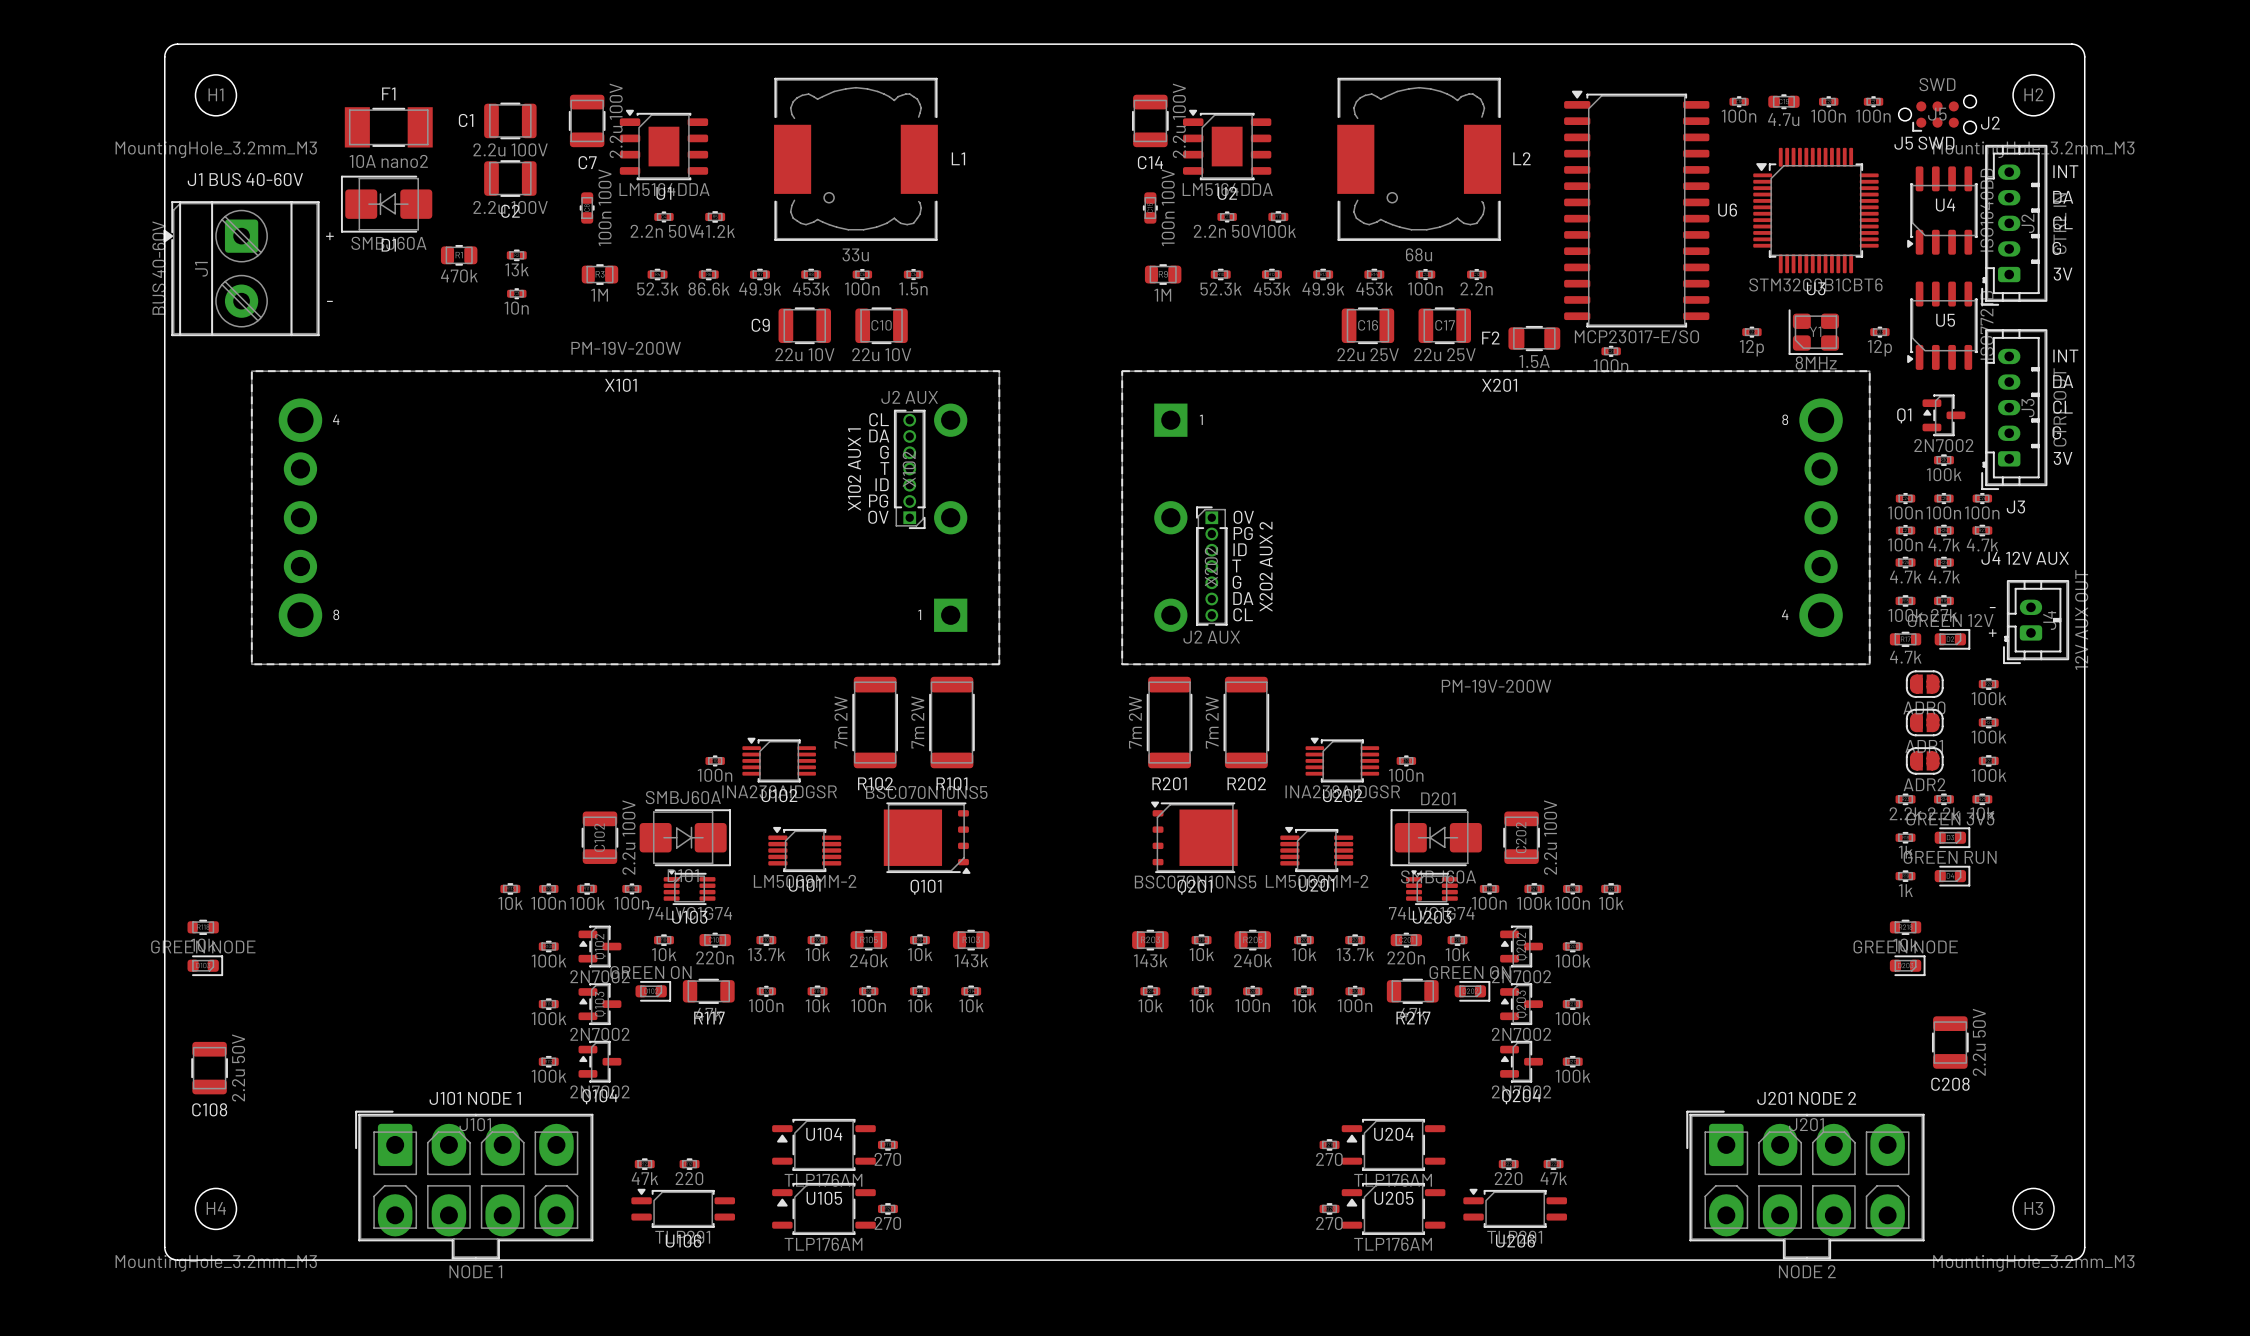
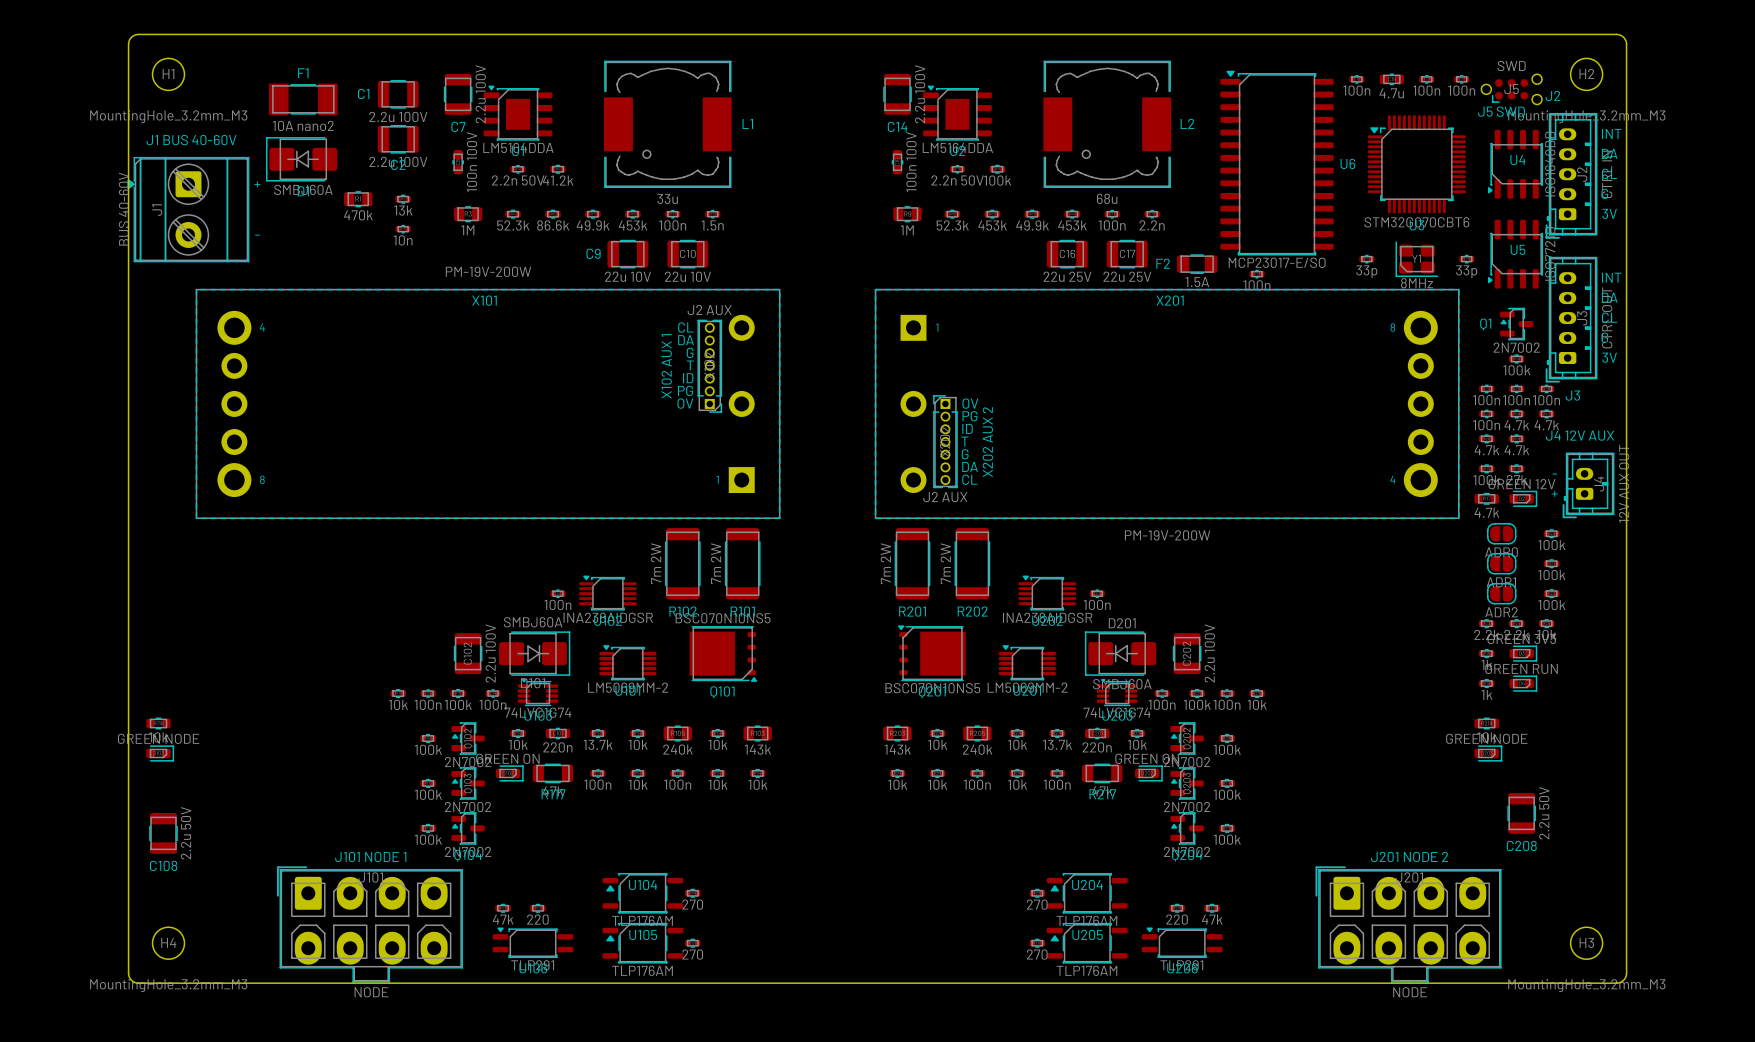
U3 value: STM32G0B1CBT6 (1815, 284) -> STM32G070CBT6 (1416, 222)
part value: 12p (1751, 348) -> 33p (1366, 271)
part value: 12p (1879, 348) -> 33p (1466, 271)
J101 value: NODE 1 (475, 1271) -> NODE (371, 992)
J201 value: NODE 2 (1807, 1271) -> NODE (1410, 992)

